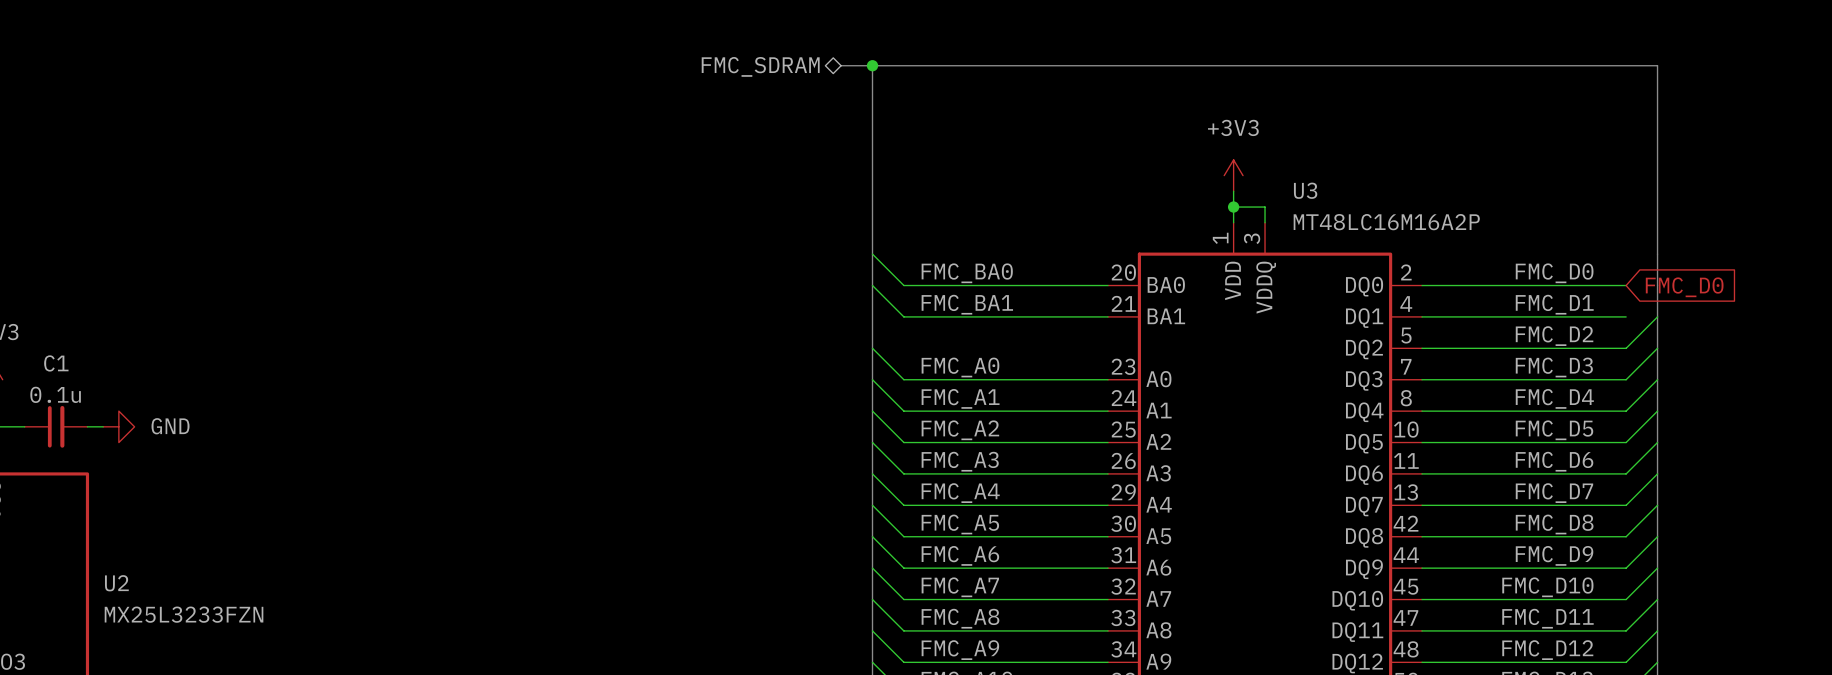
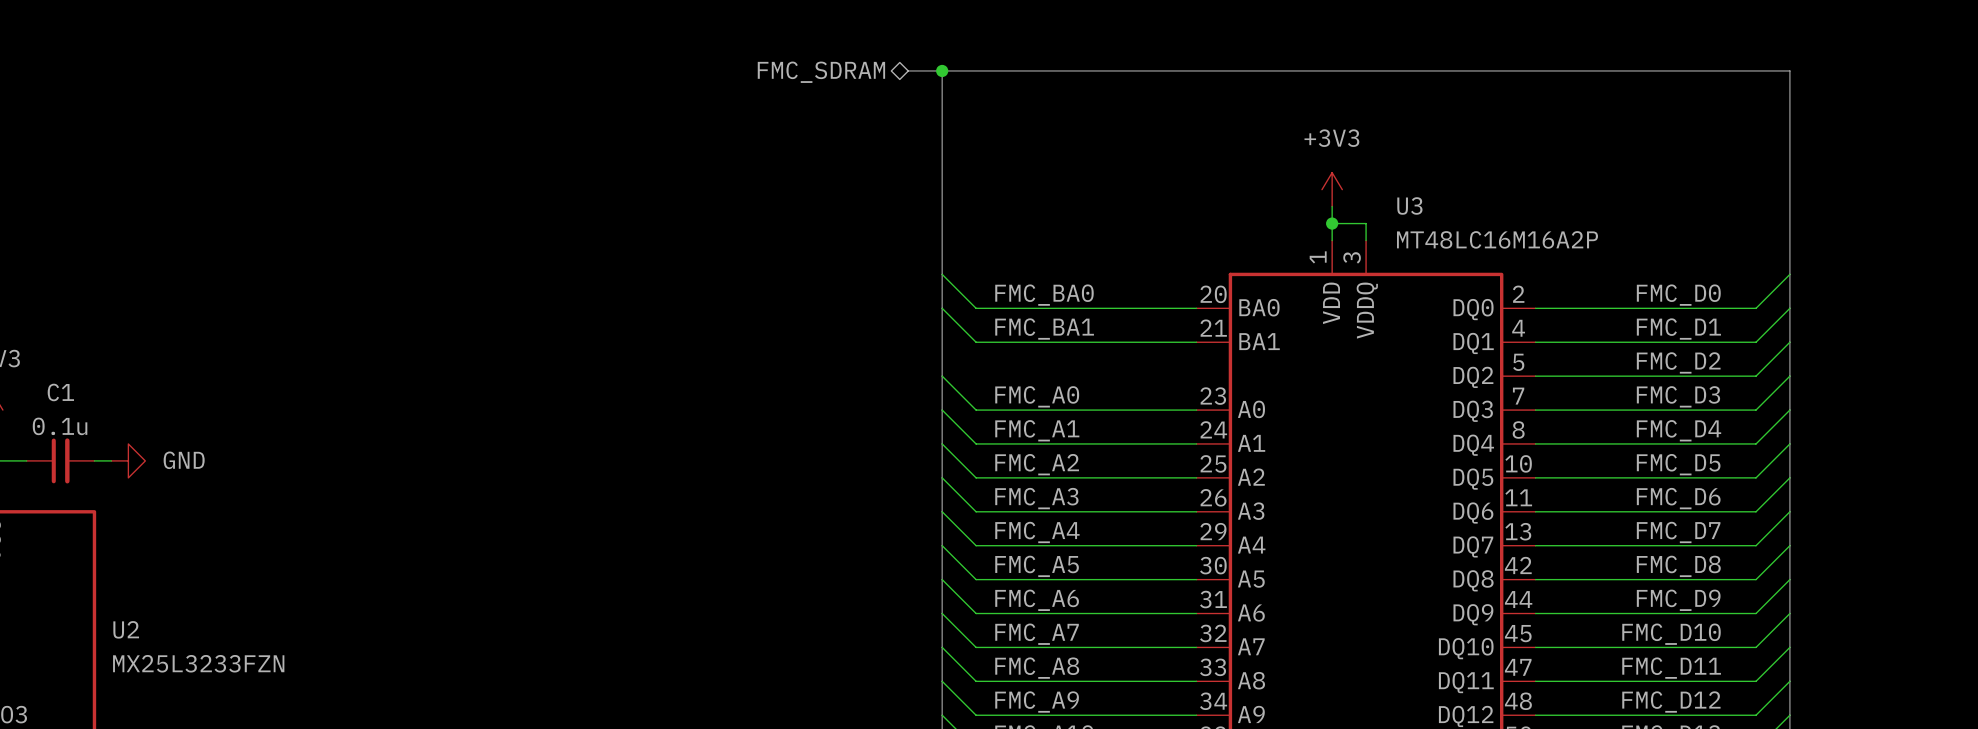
wire: none -> (1789, 274) (1756, 308)
wire: none -> (1789, 308) (1756, 342)
global label: FMC_D0 (1684, 287) -> none

